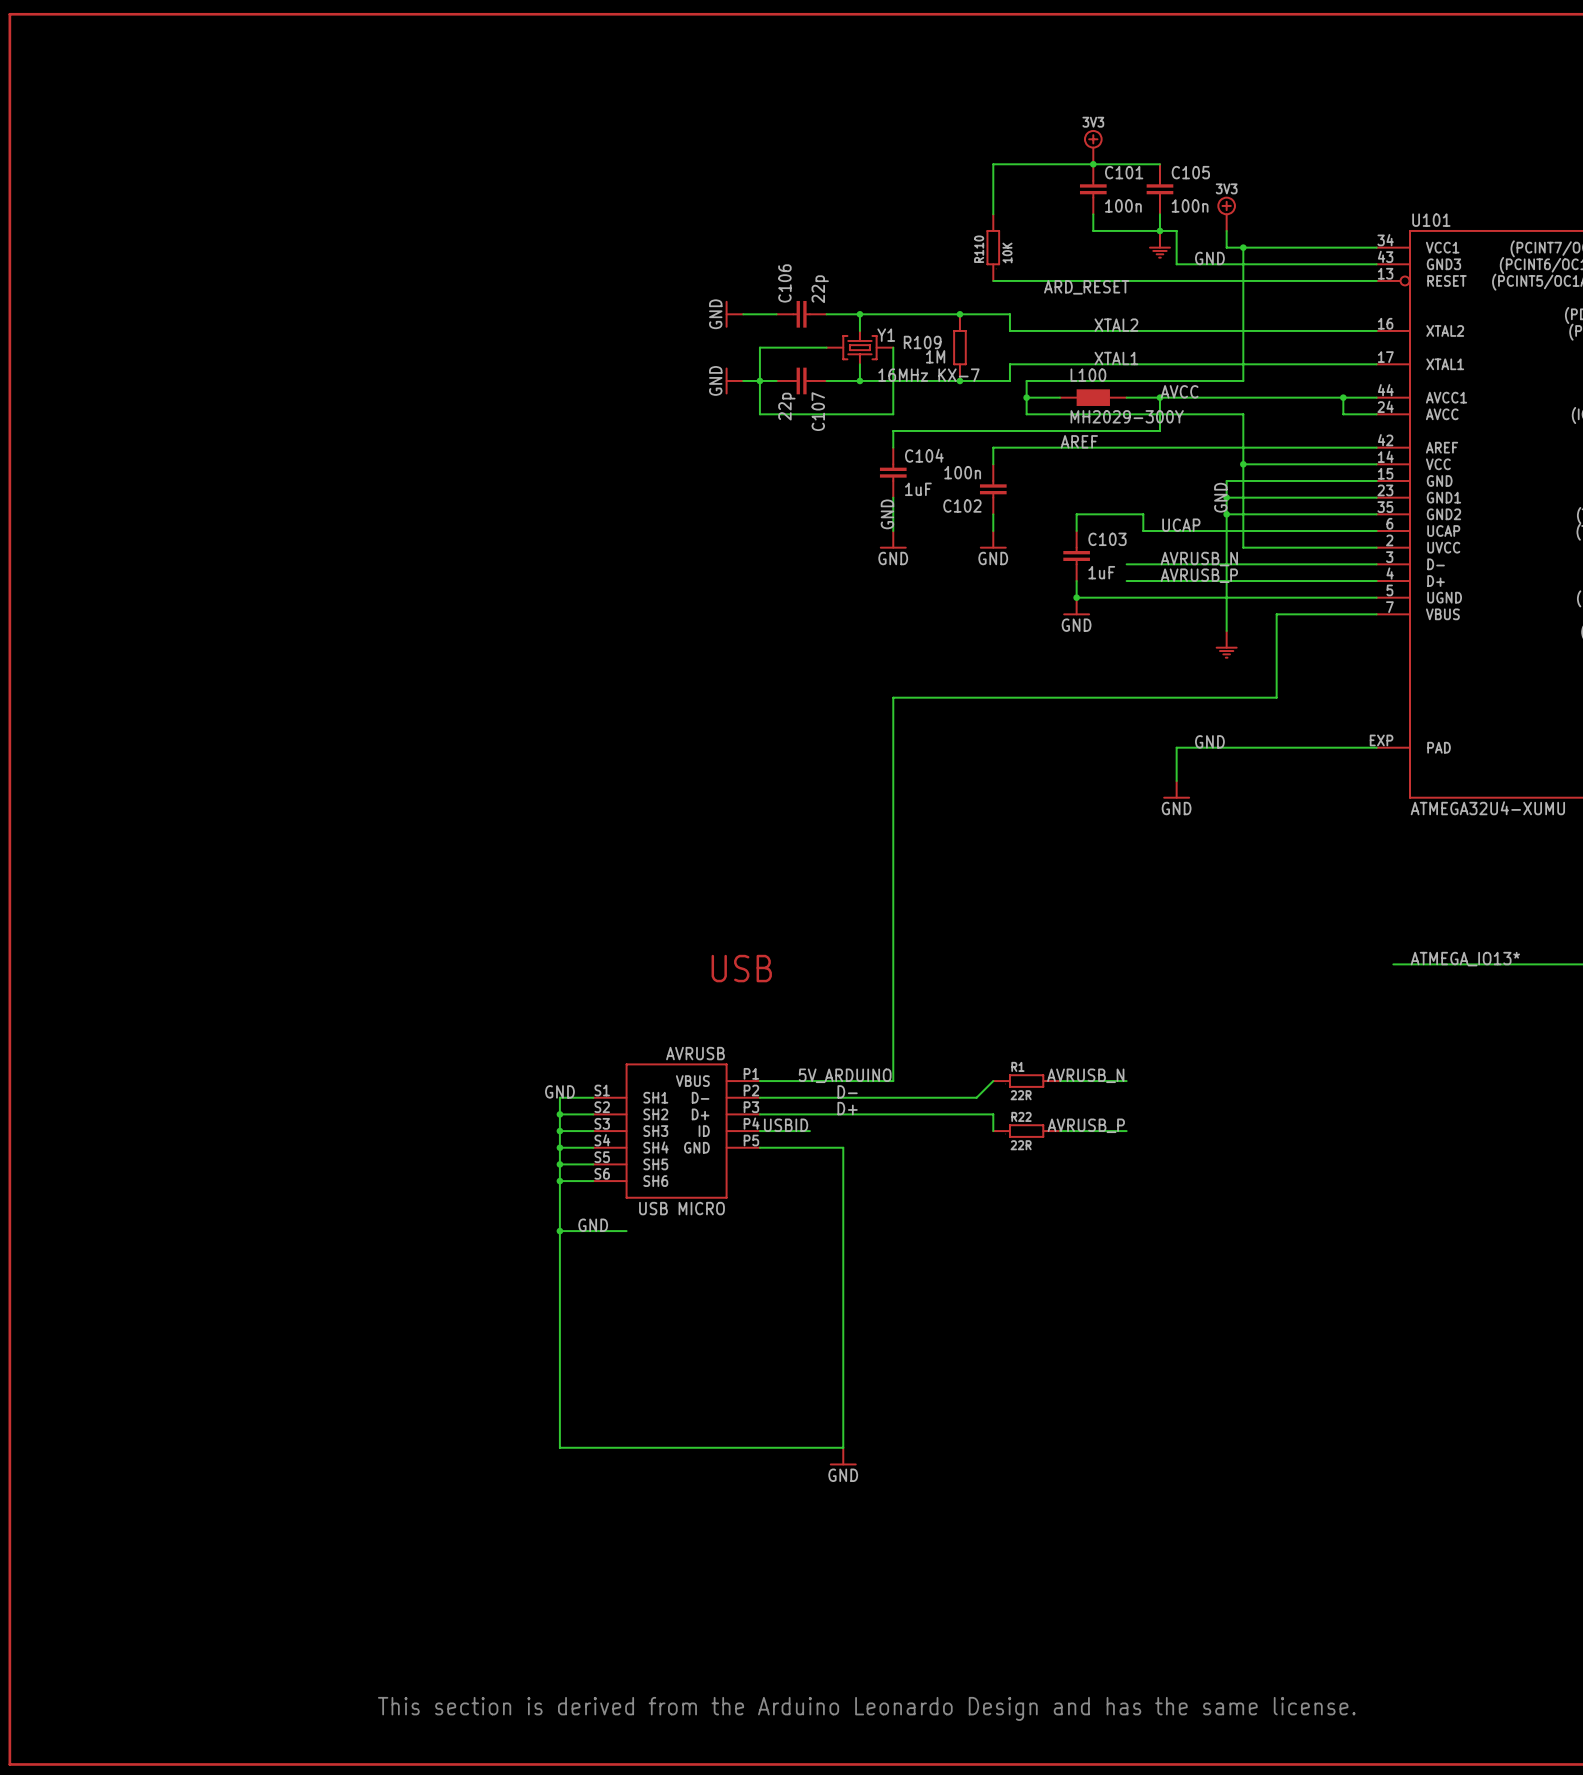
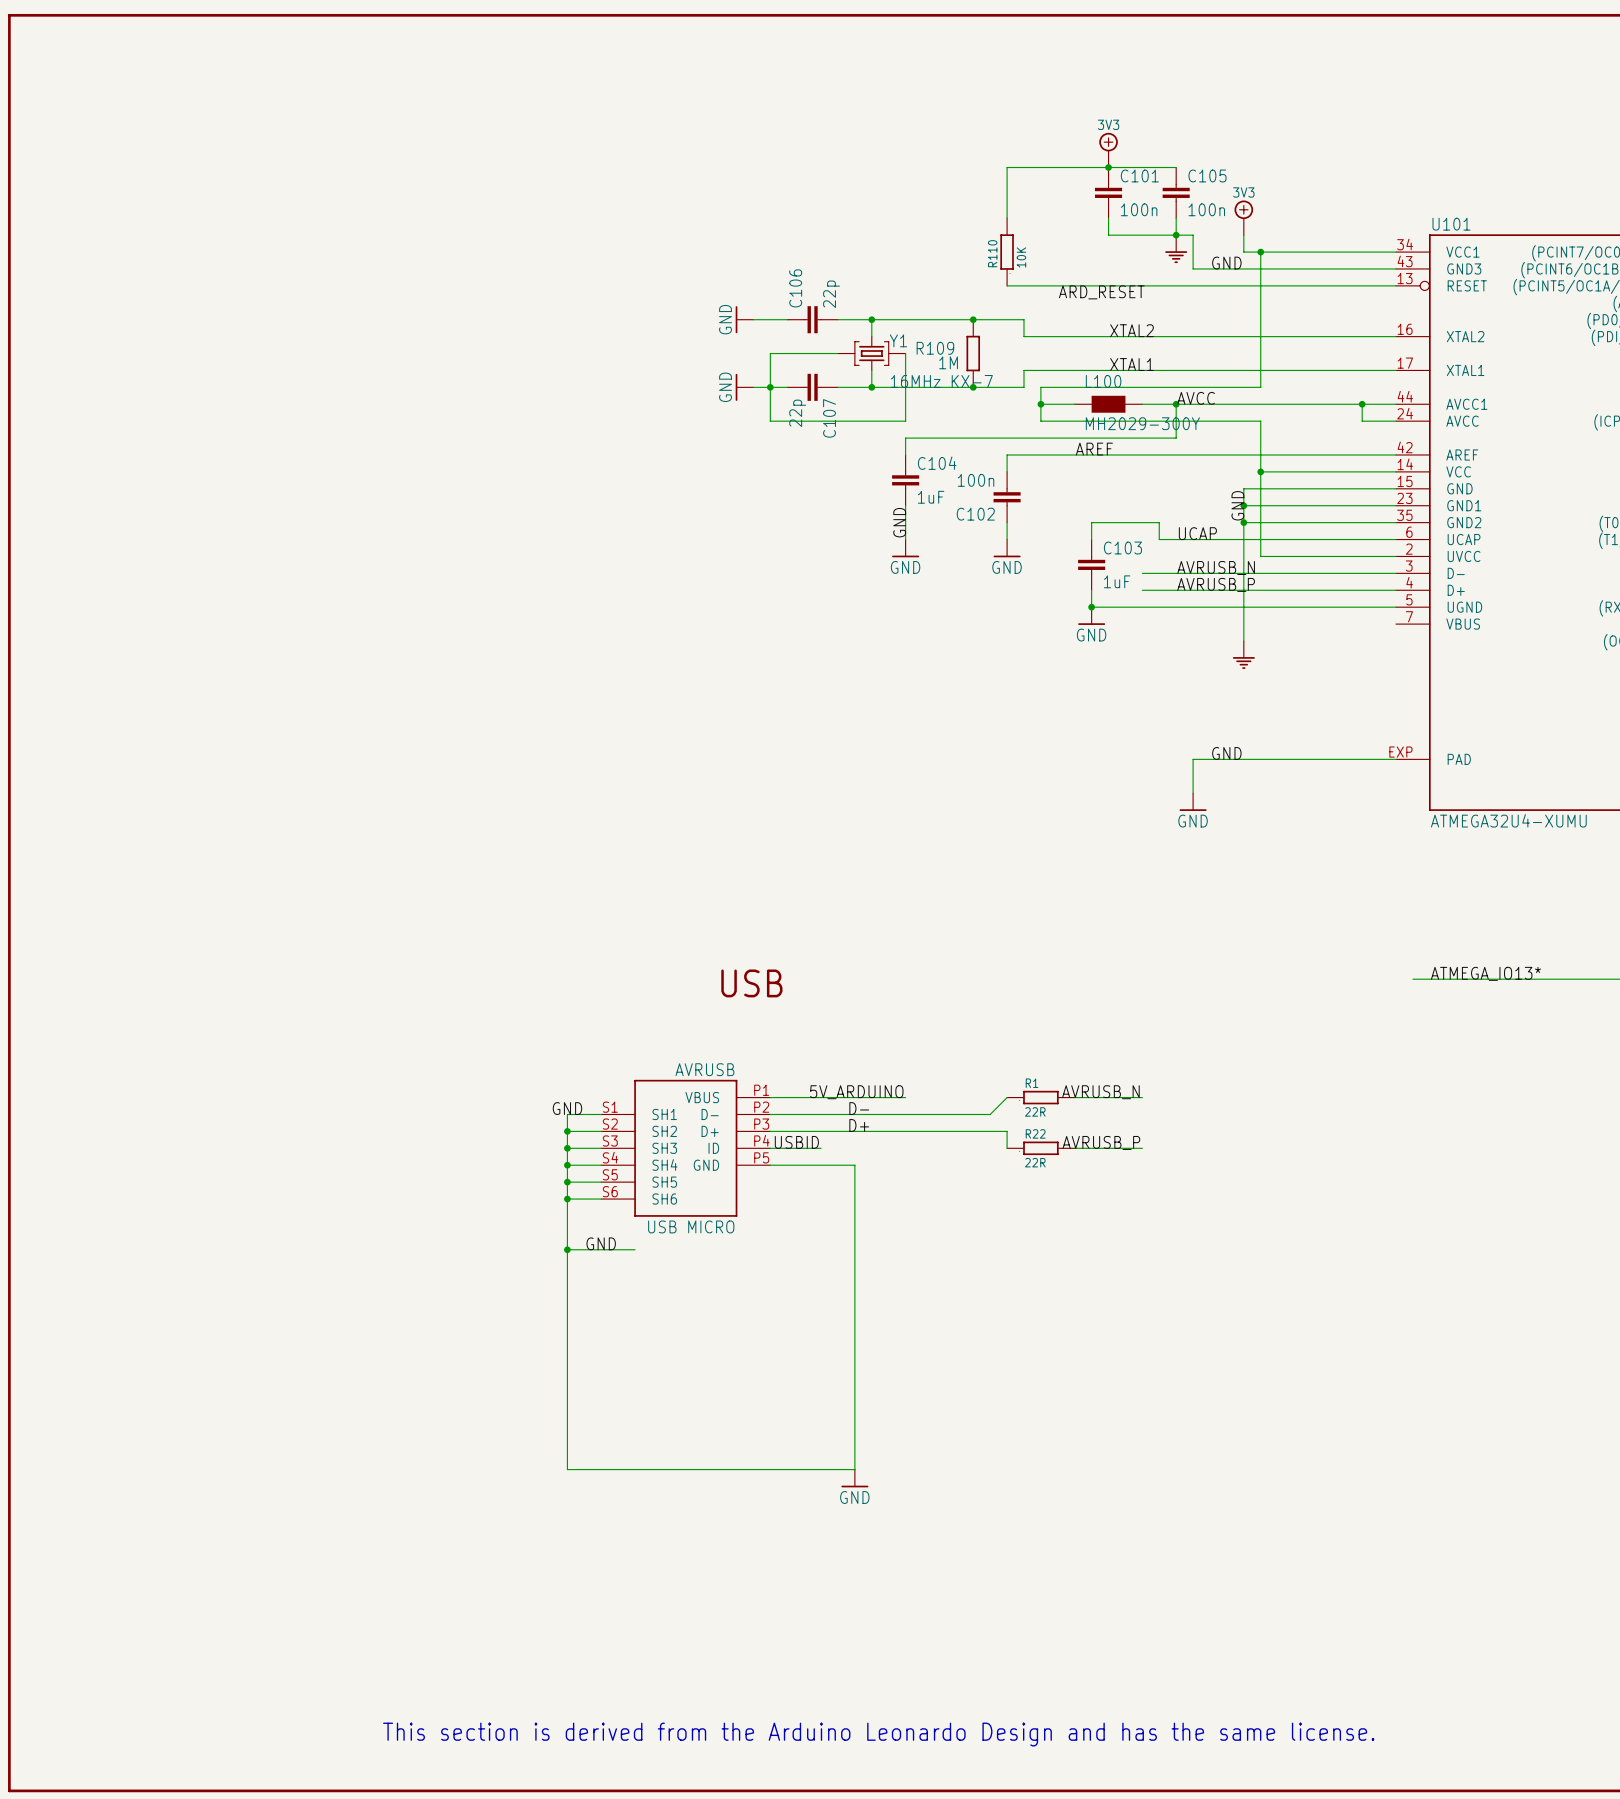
wire: (1376, 614) (1276, 614) (1276, 697) (893, 697) (893, 1081) -> none

